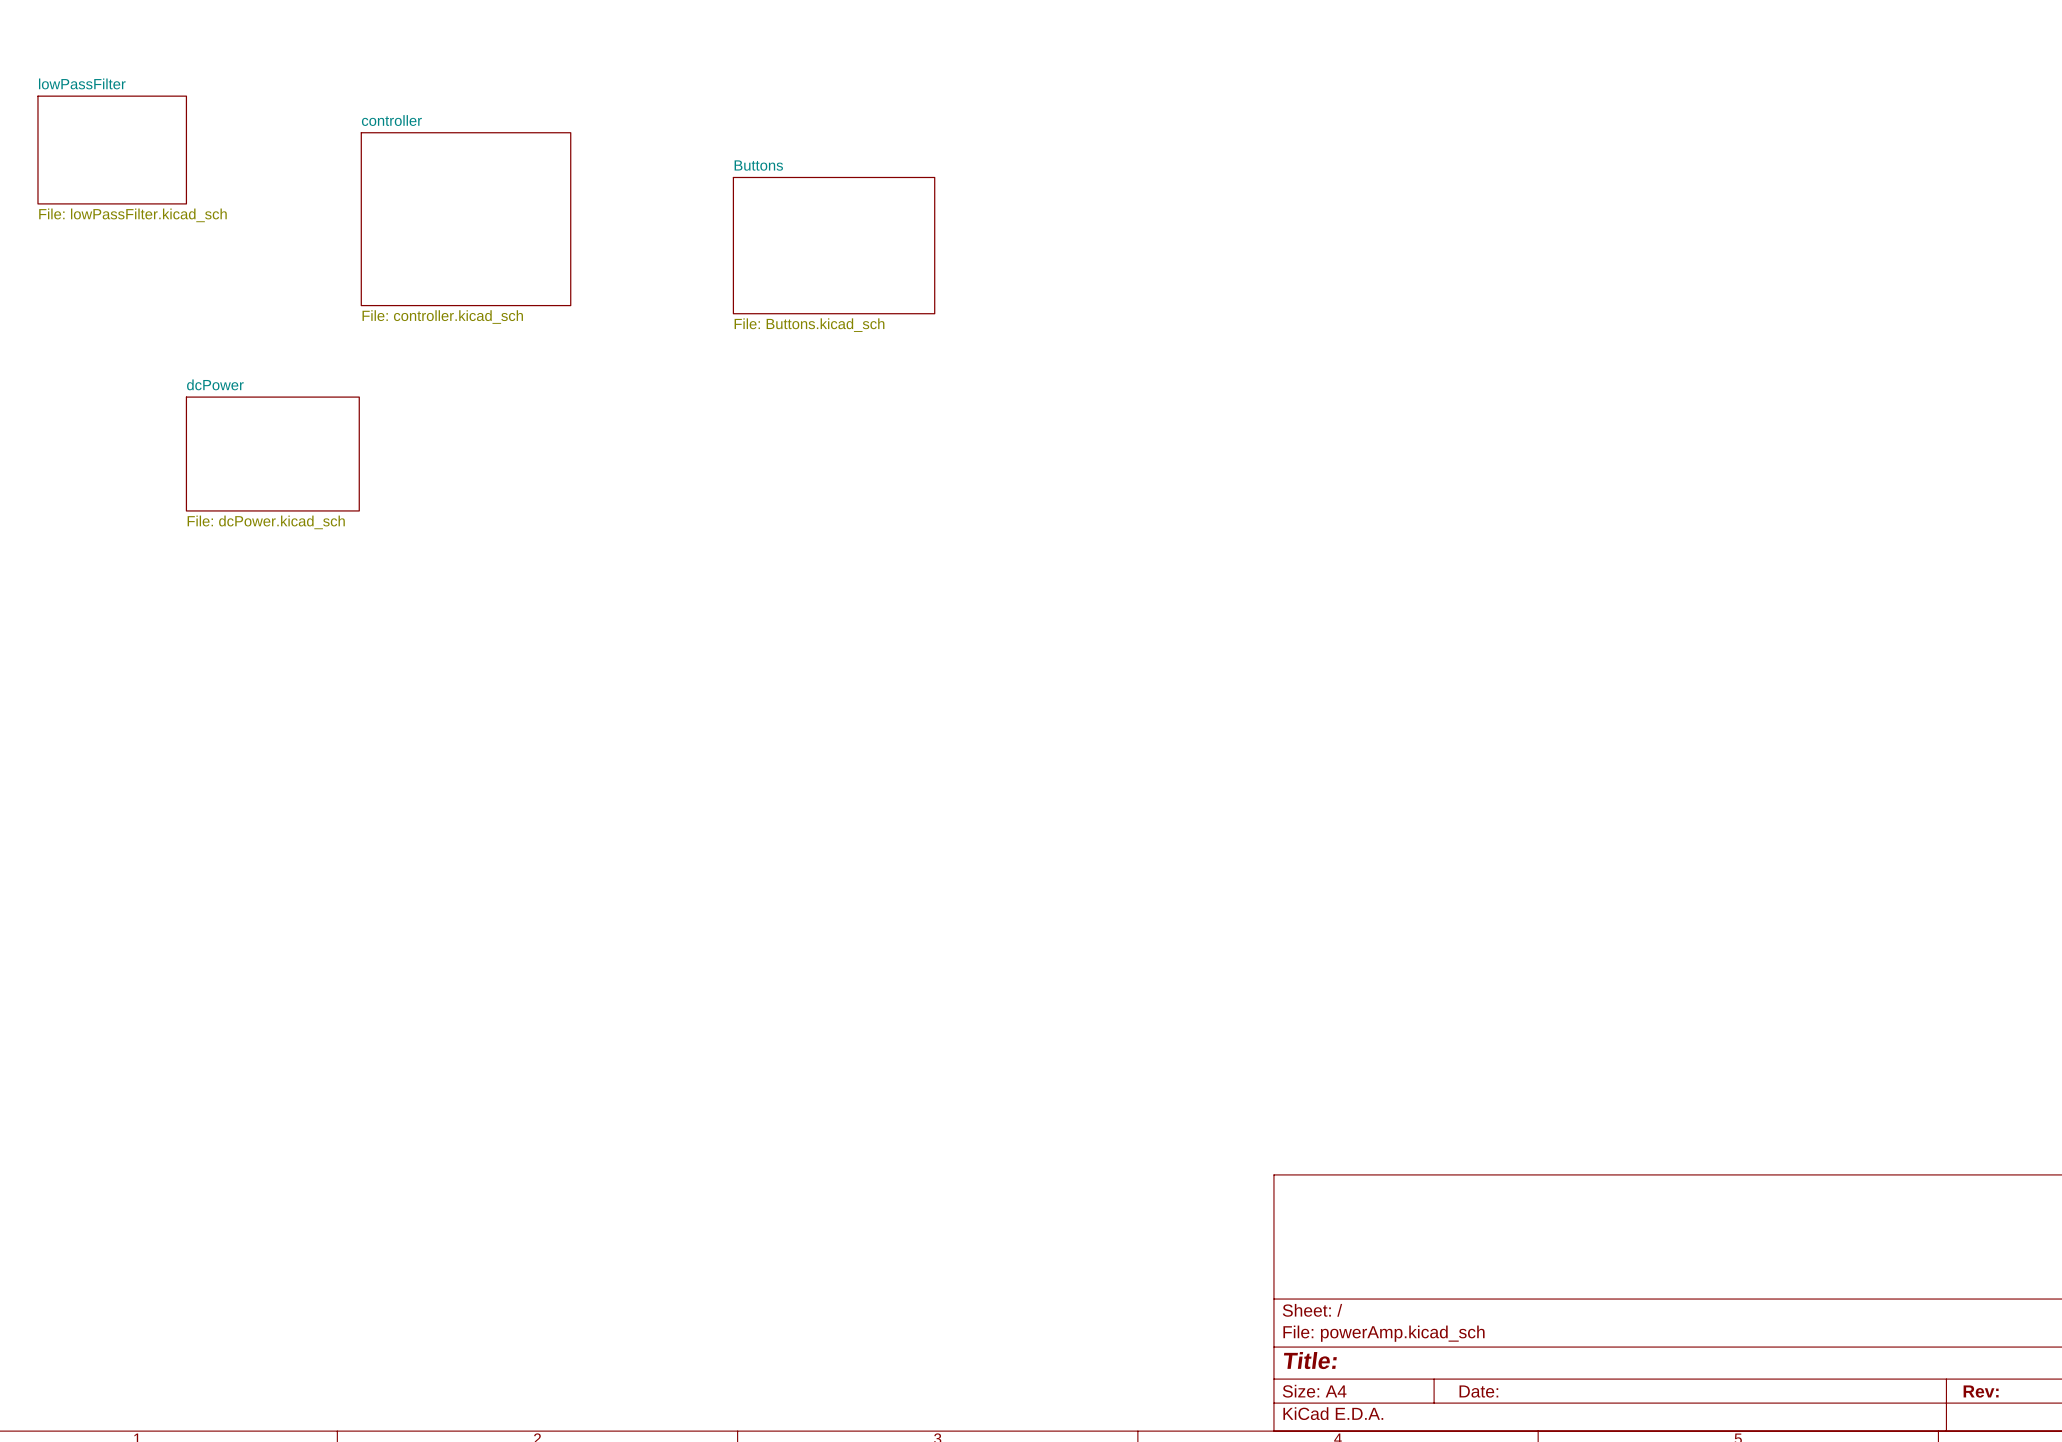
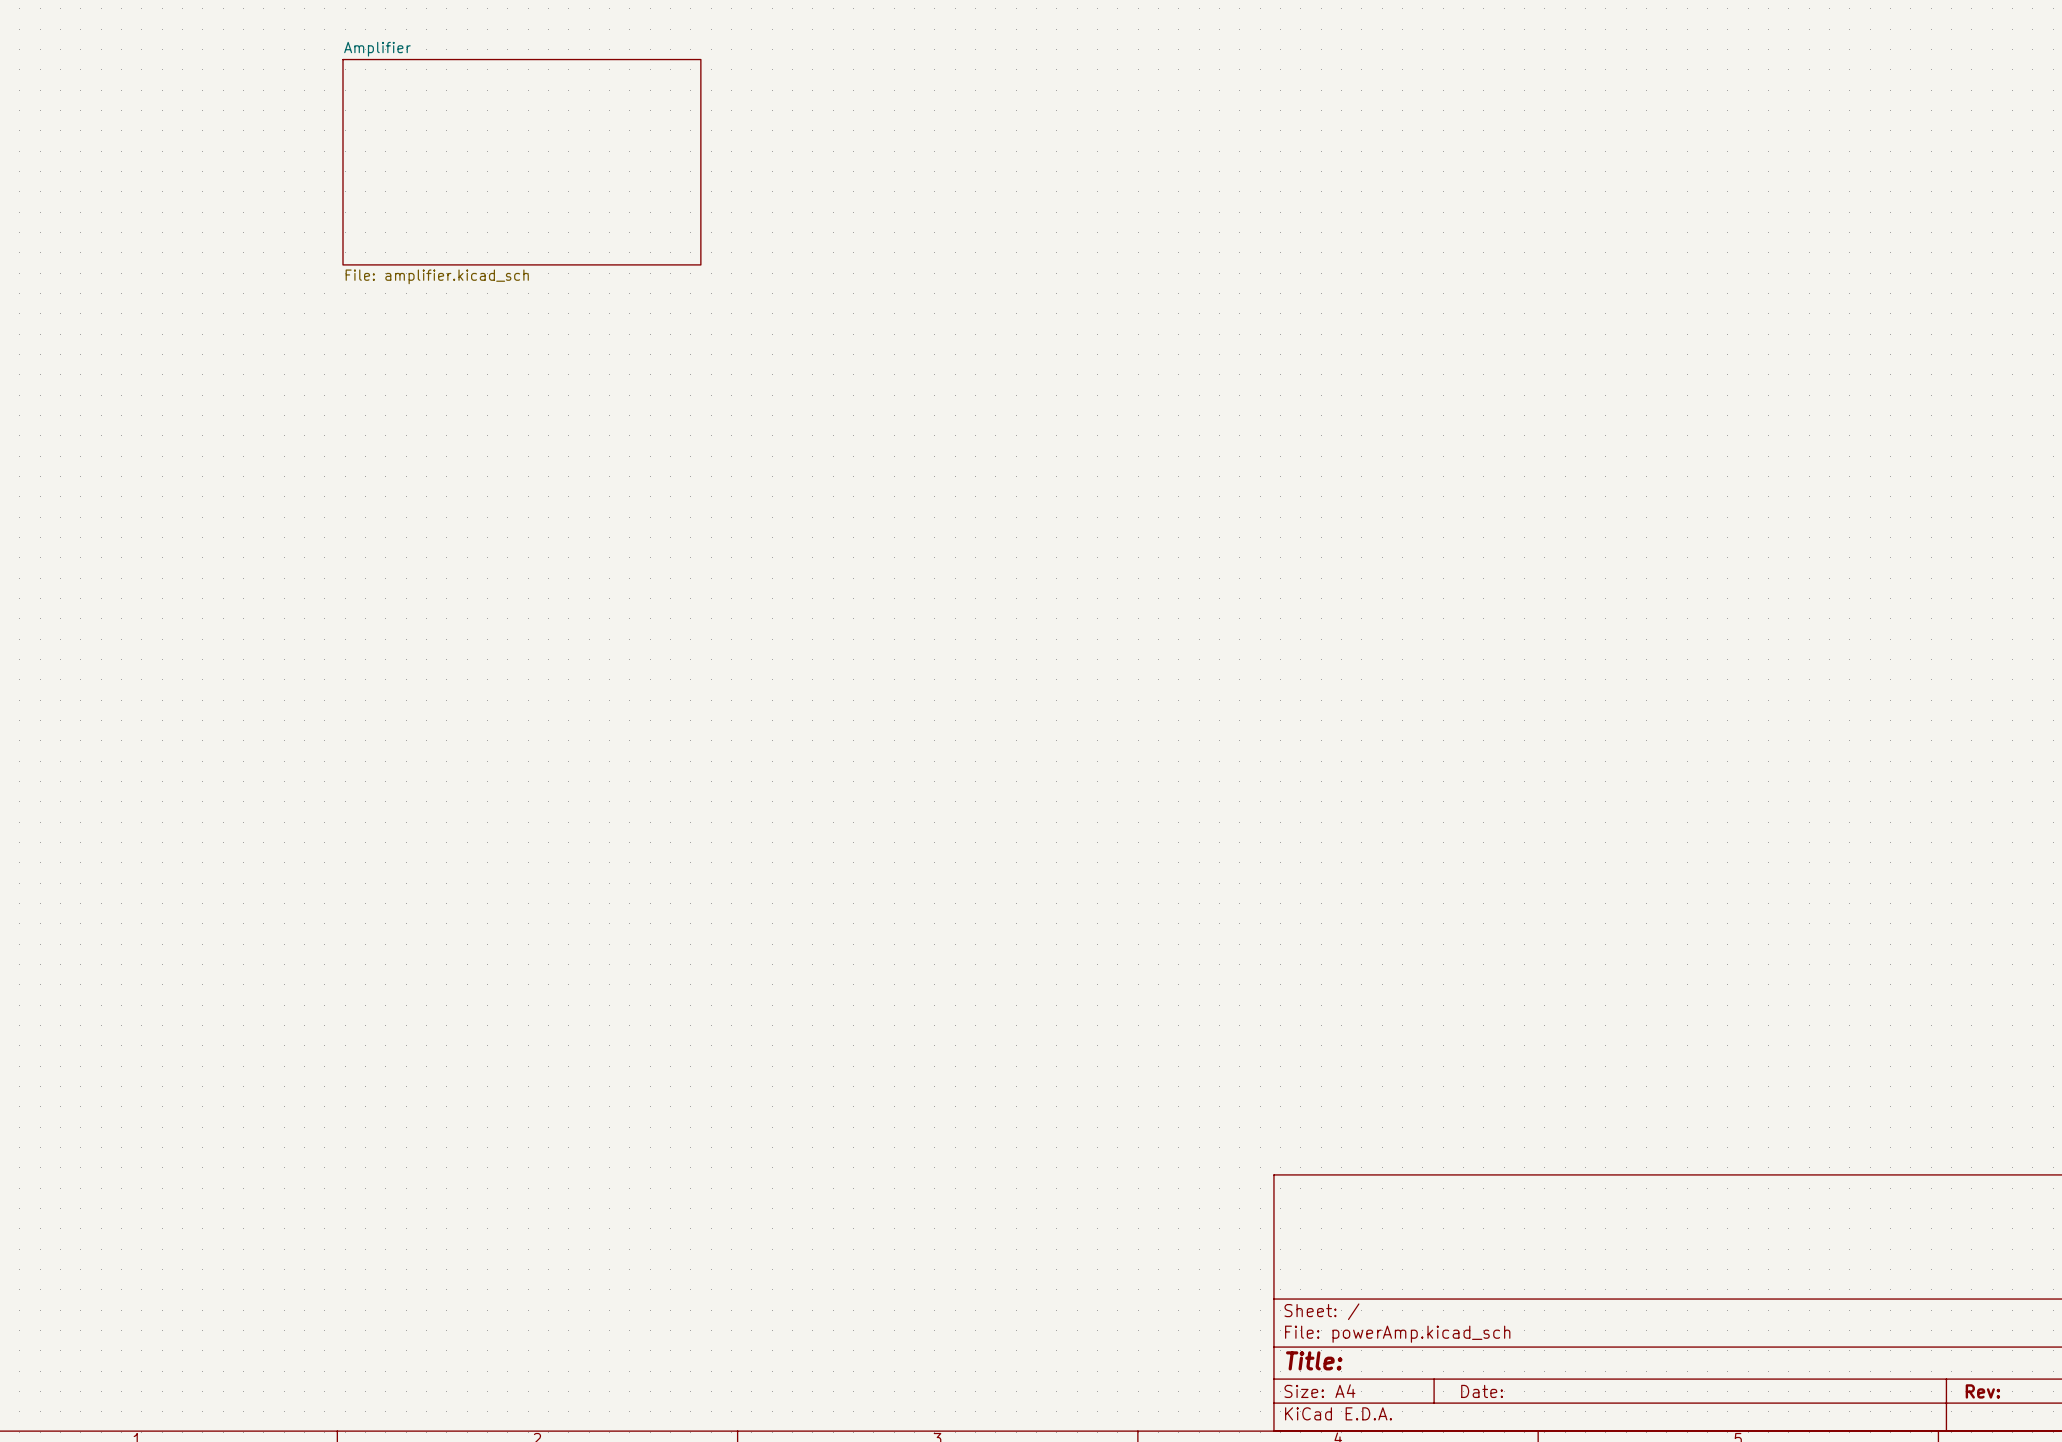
sheet lowPassFilter: File: lowPassFilter.kicad_sch (112, 150) -> none
sheet Amplifier: none -> File: amplifier.kicad_sch (521, 162)
sheet controller: File: controller.kicad_sch (466, 219) -> none
sheet Buttons: File: Buttons.kicad_sch (834, 245) -> none
sheet dcPower: File: dcPower.kicad_sch (272, 454) -> none

